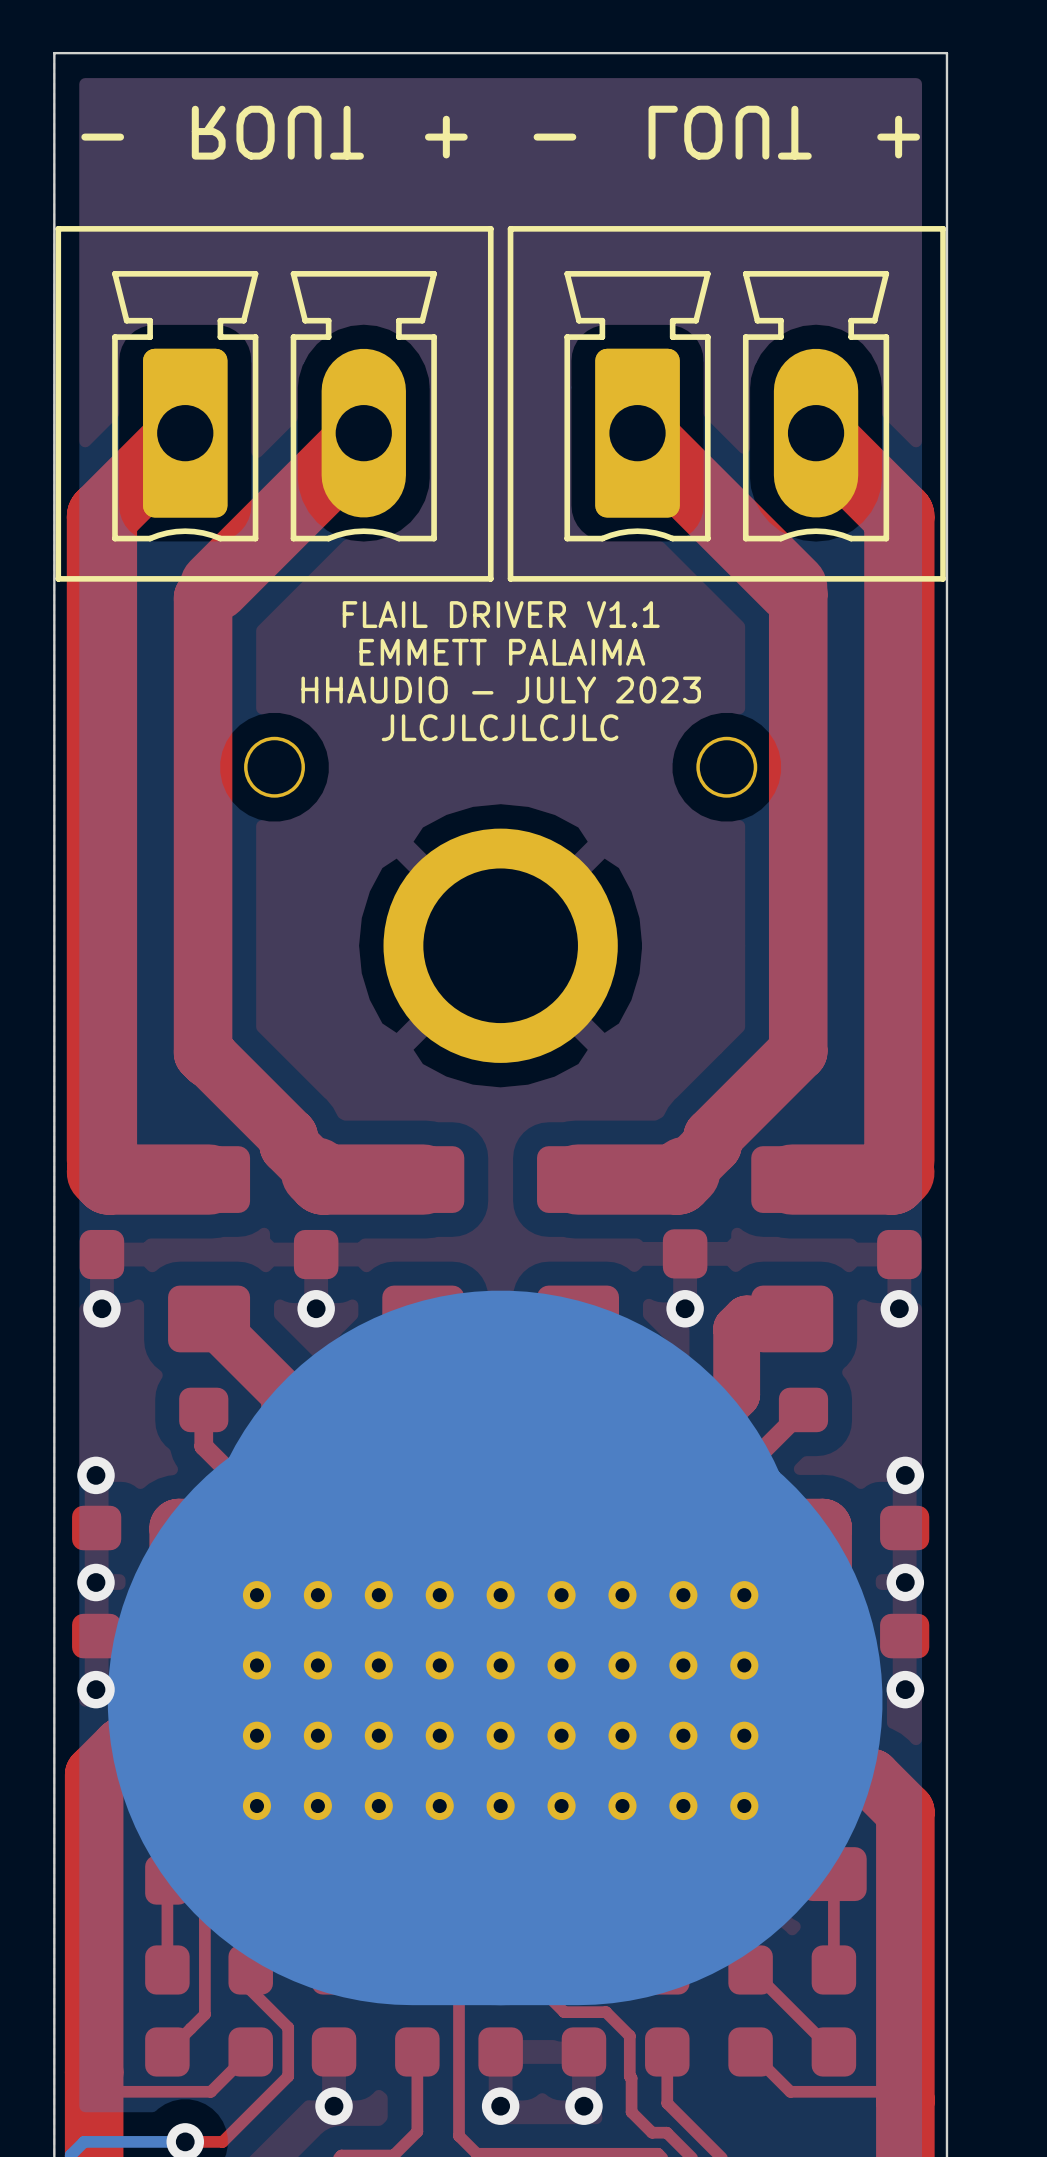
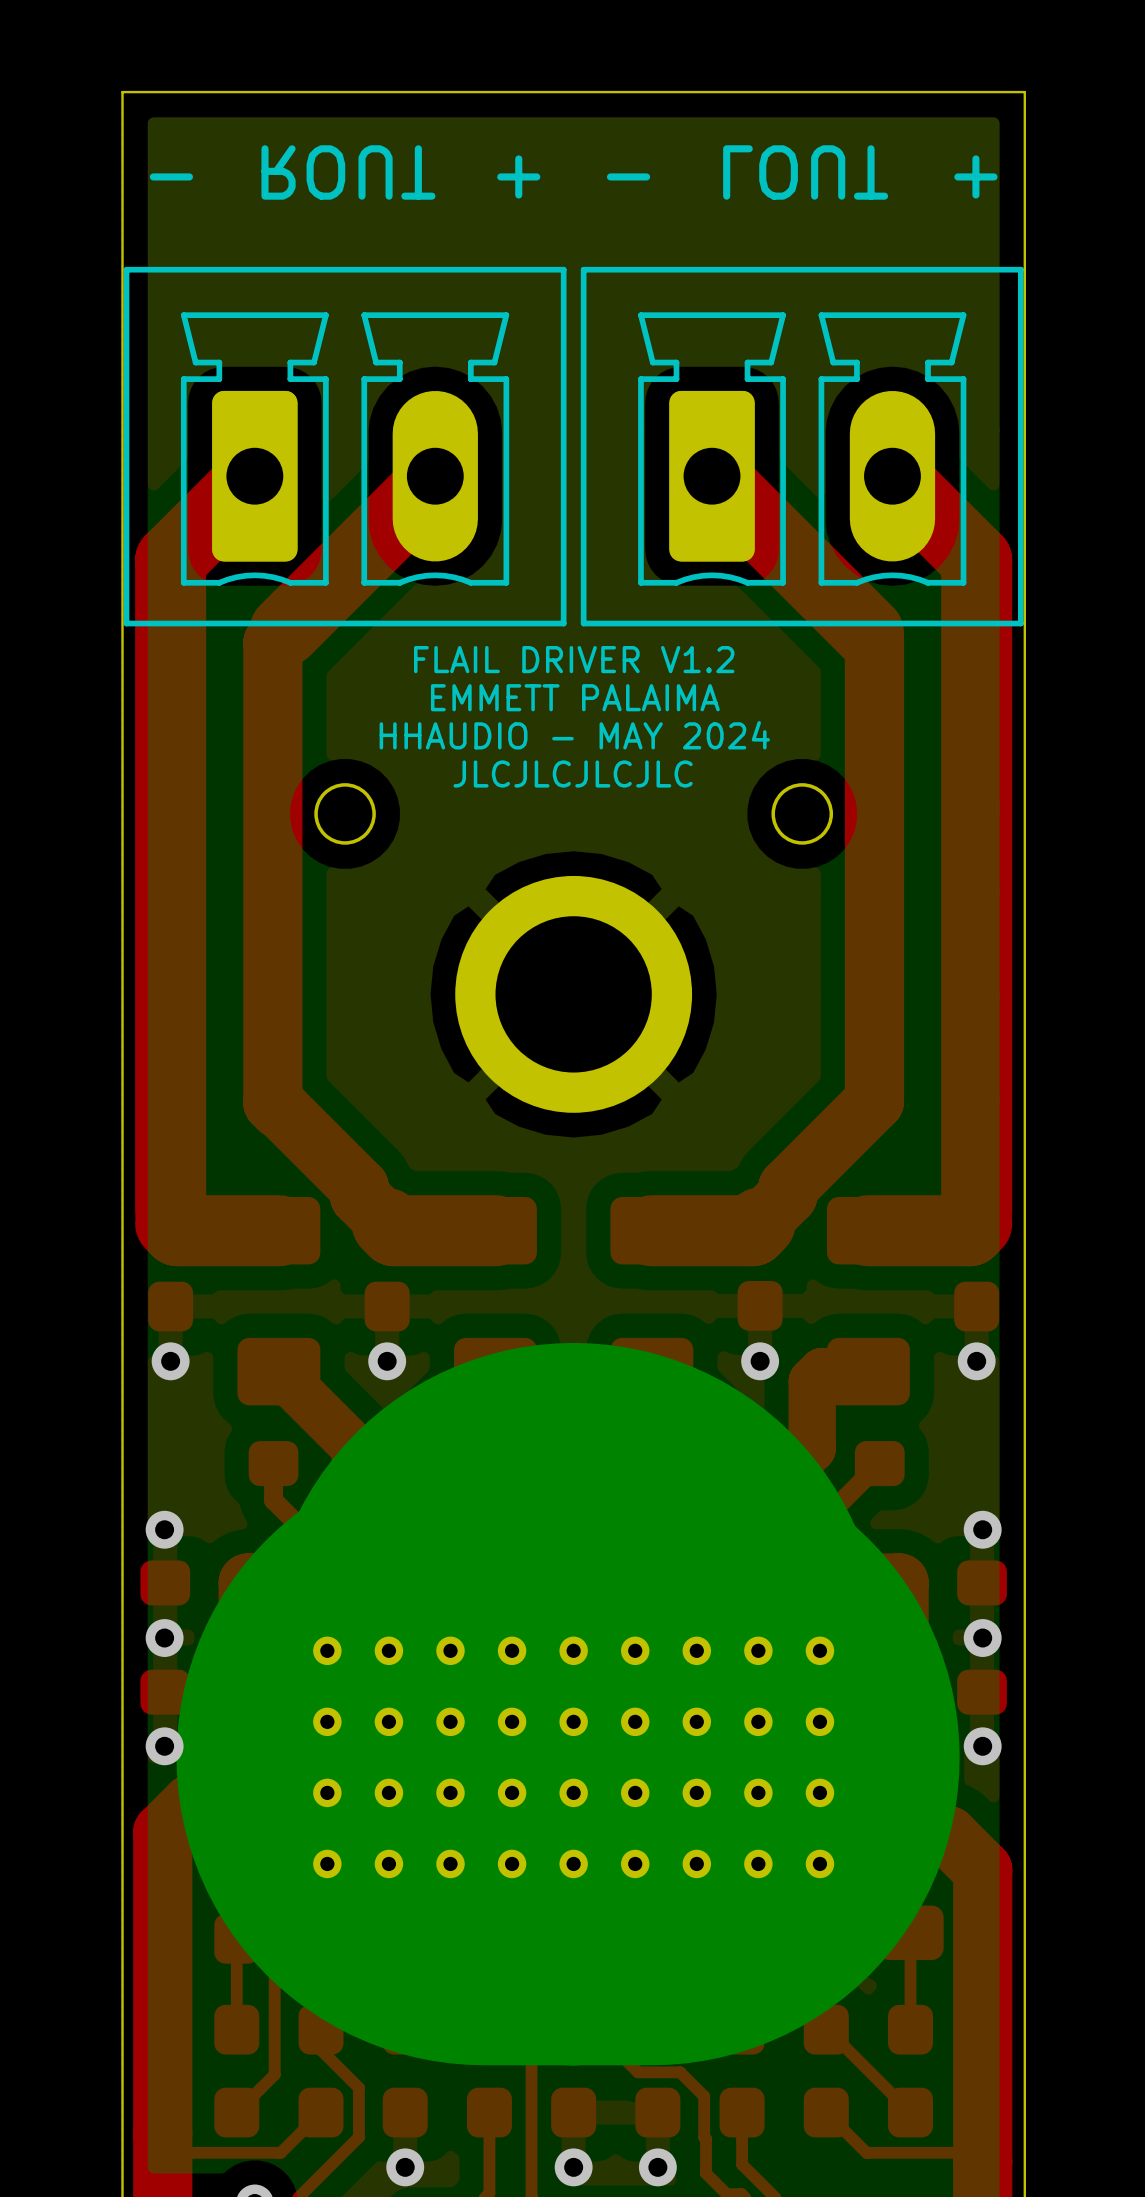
text: FLAIL DRIVER V1.1 (501, 614) -> FLAIL DRIVER V1.2 (574, 659)
text: HHAUDIO - JULY 2023 (501, 690) -> HHAUDIO - MAY 2024 (574, 735)

